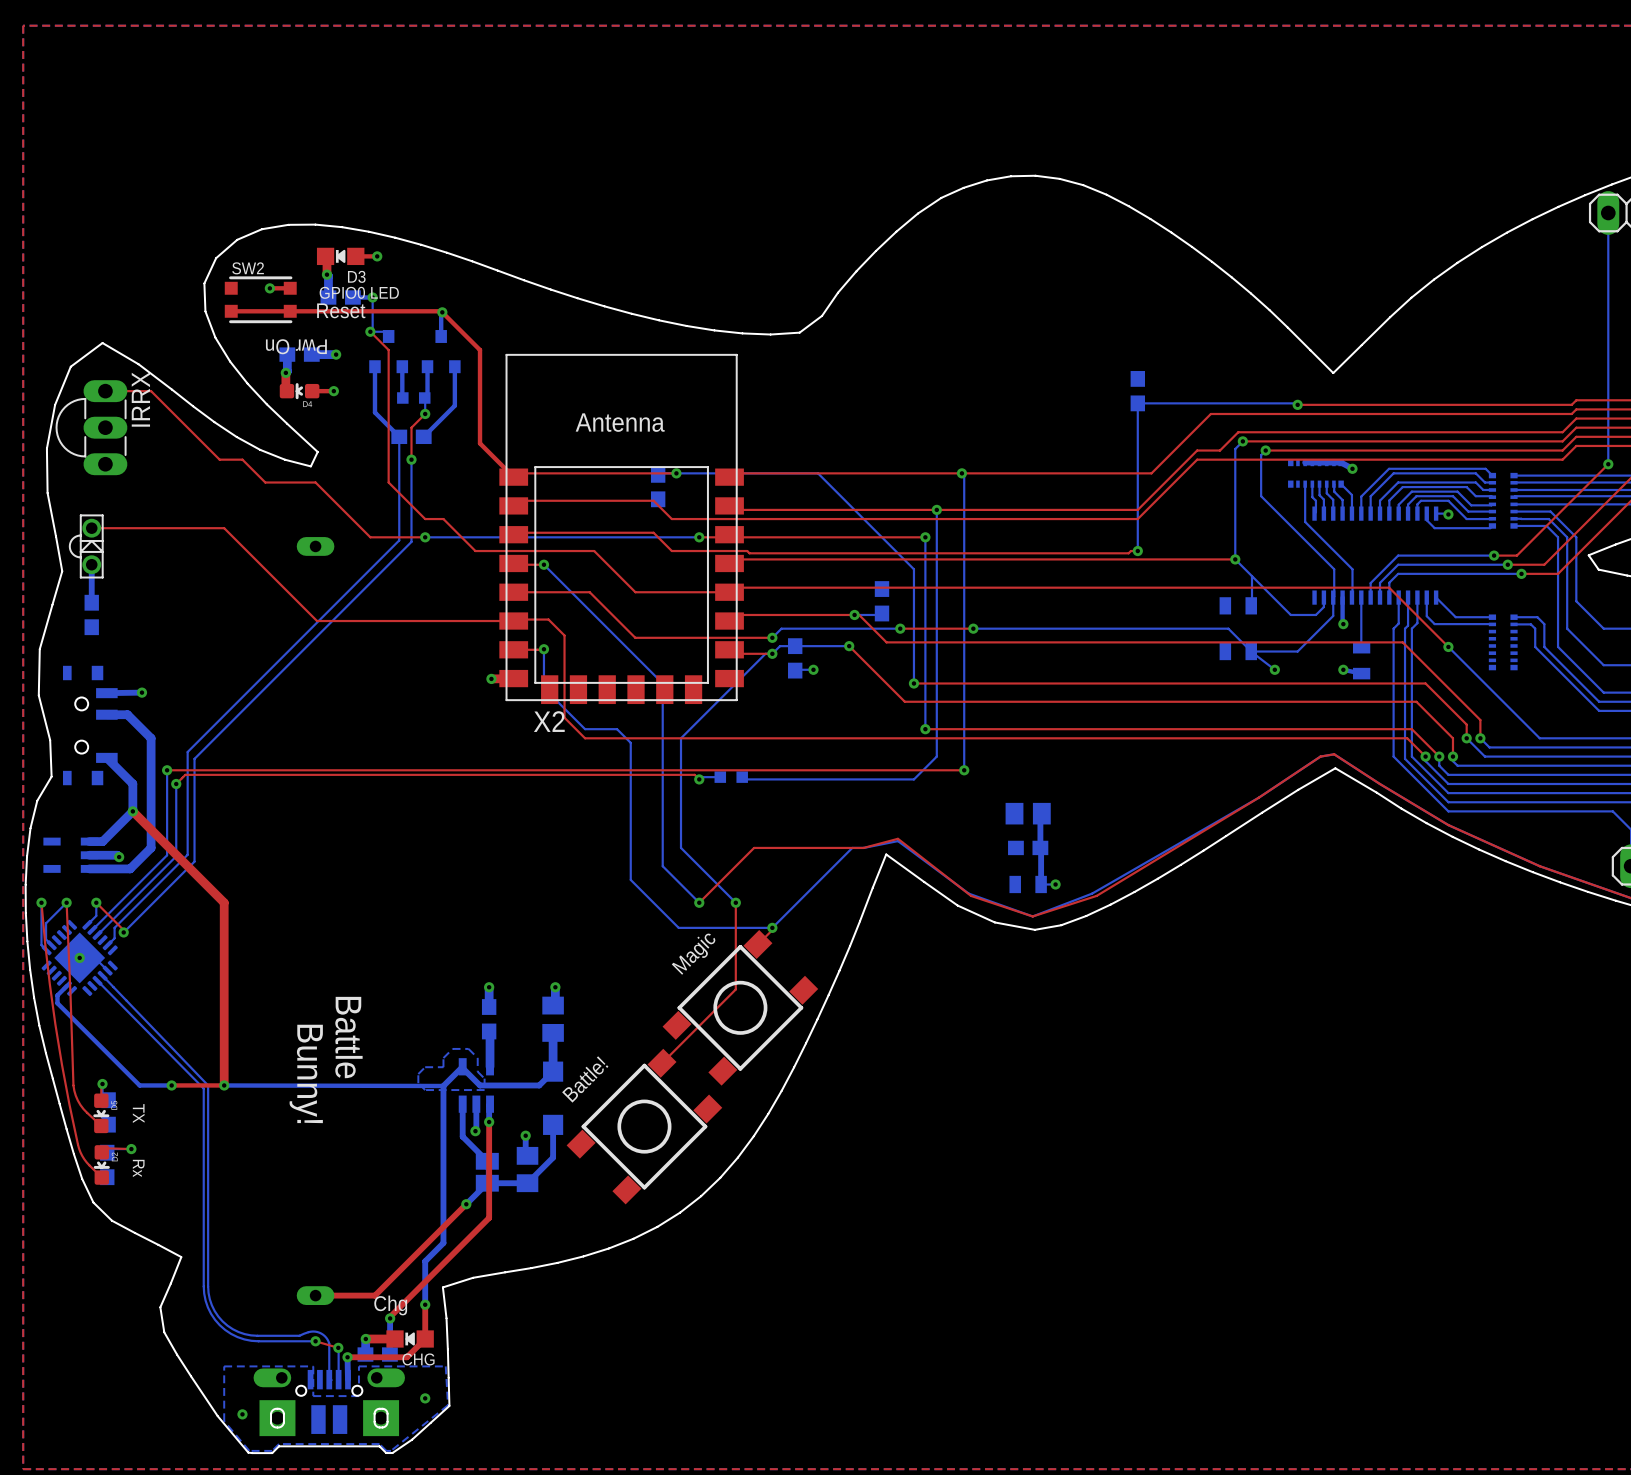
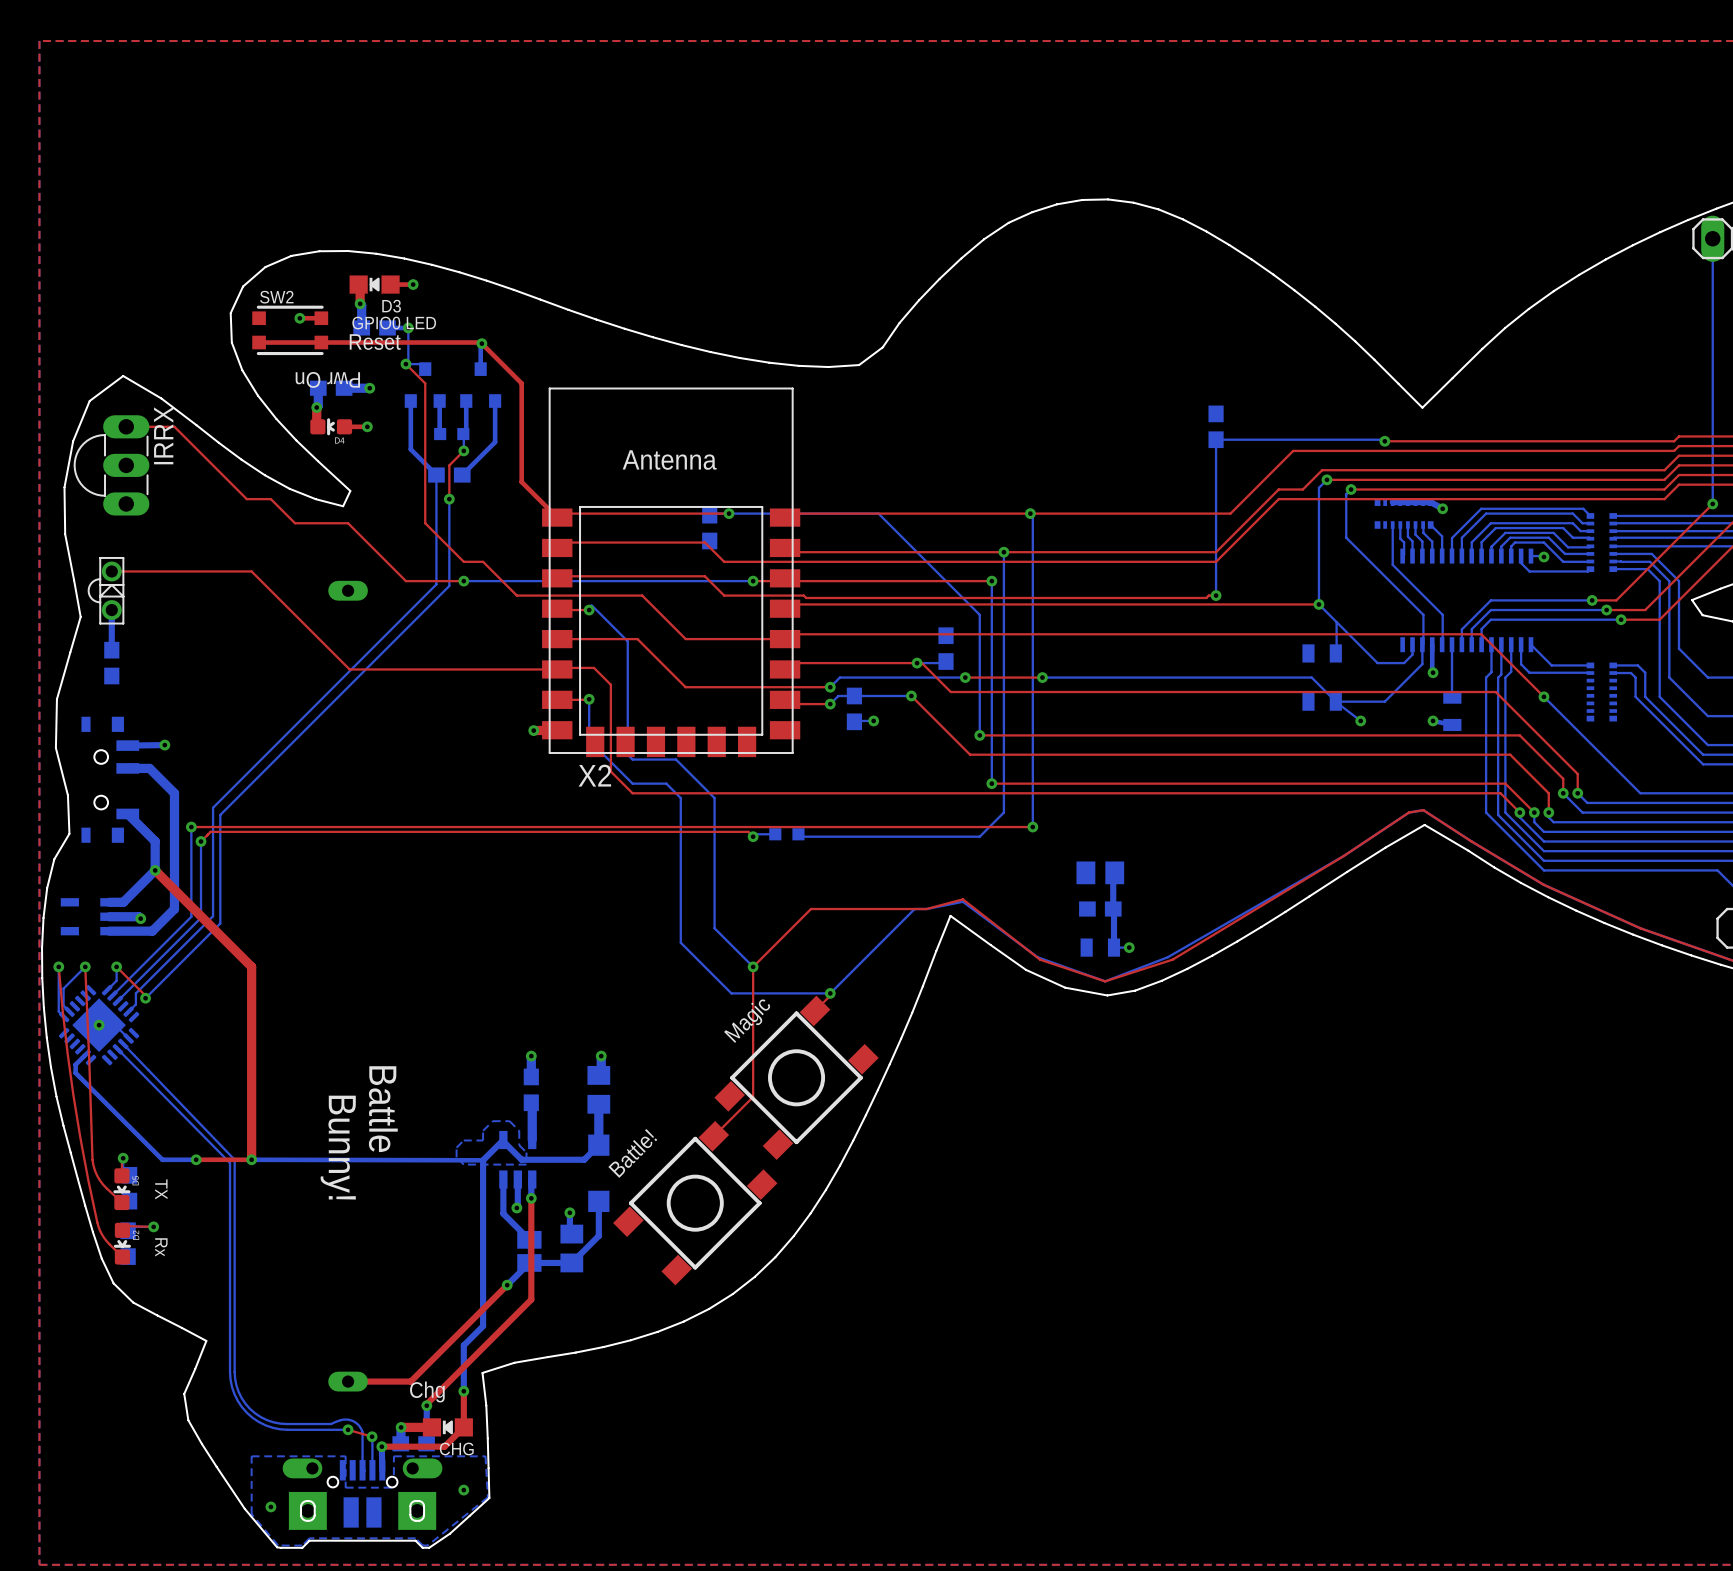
bottom track: (543, 564) (662, 683) (662, 742) -> (591, 605) (627, 641) (627, 754) (632, 759) (675, 759) (714, 798)
bottom track: (772, 653) (765, 653) (681, 738) (681, 847) (735, 902) -> none
top track: (735, 902) (735, 989) (699, 1025) -> (753, 966) (753, 1096)
via: (735, 902) -> none

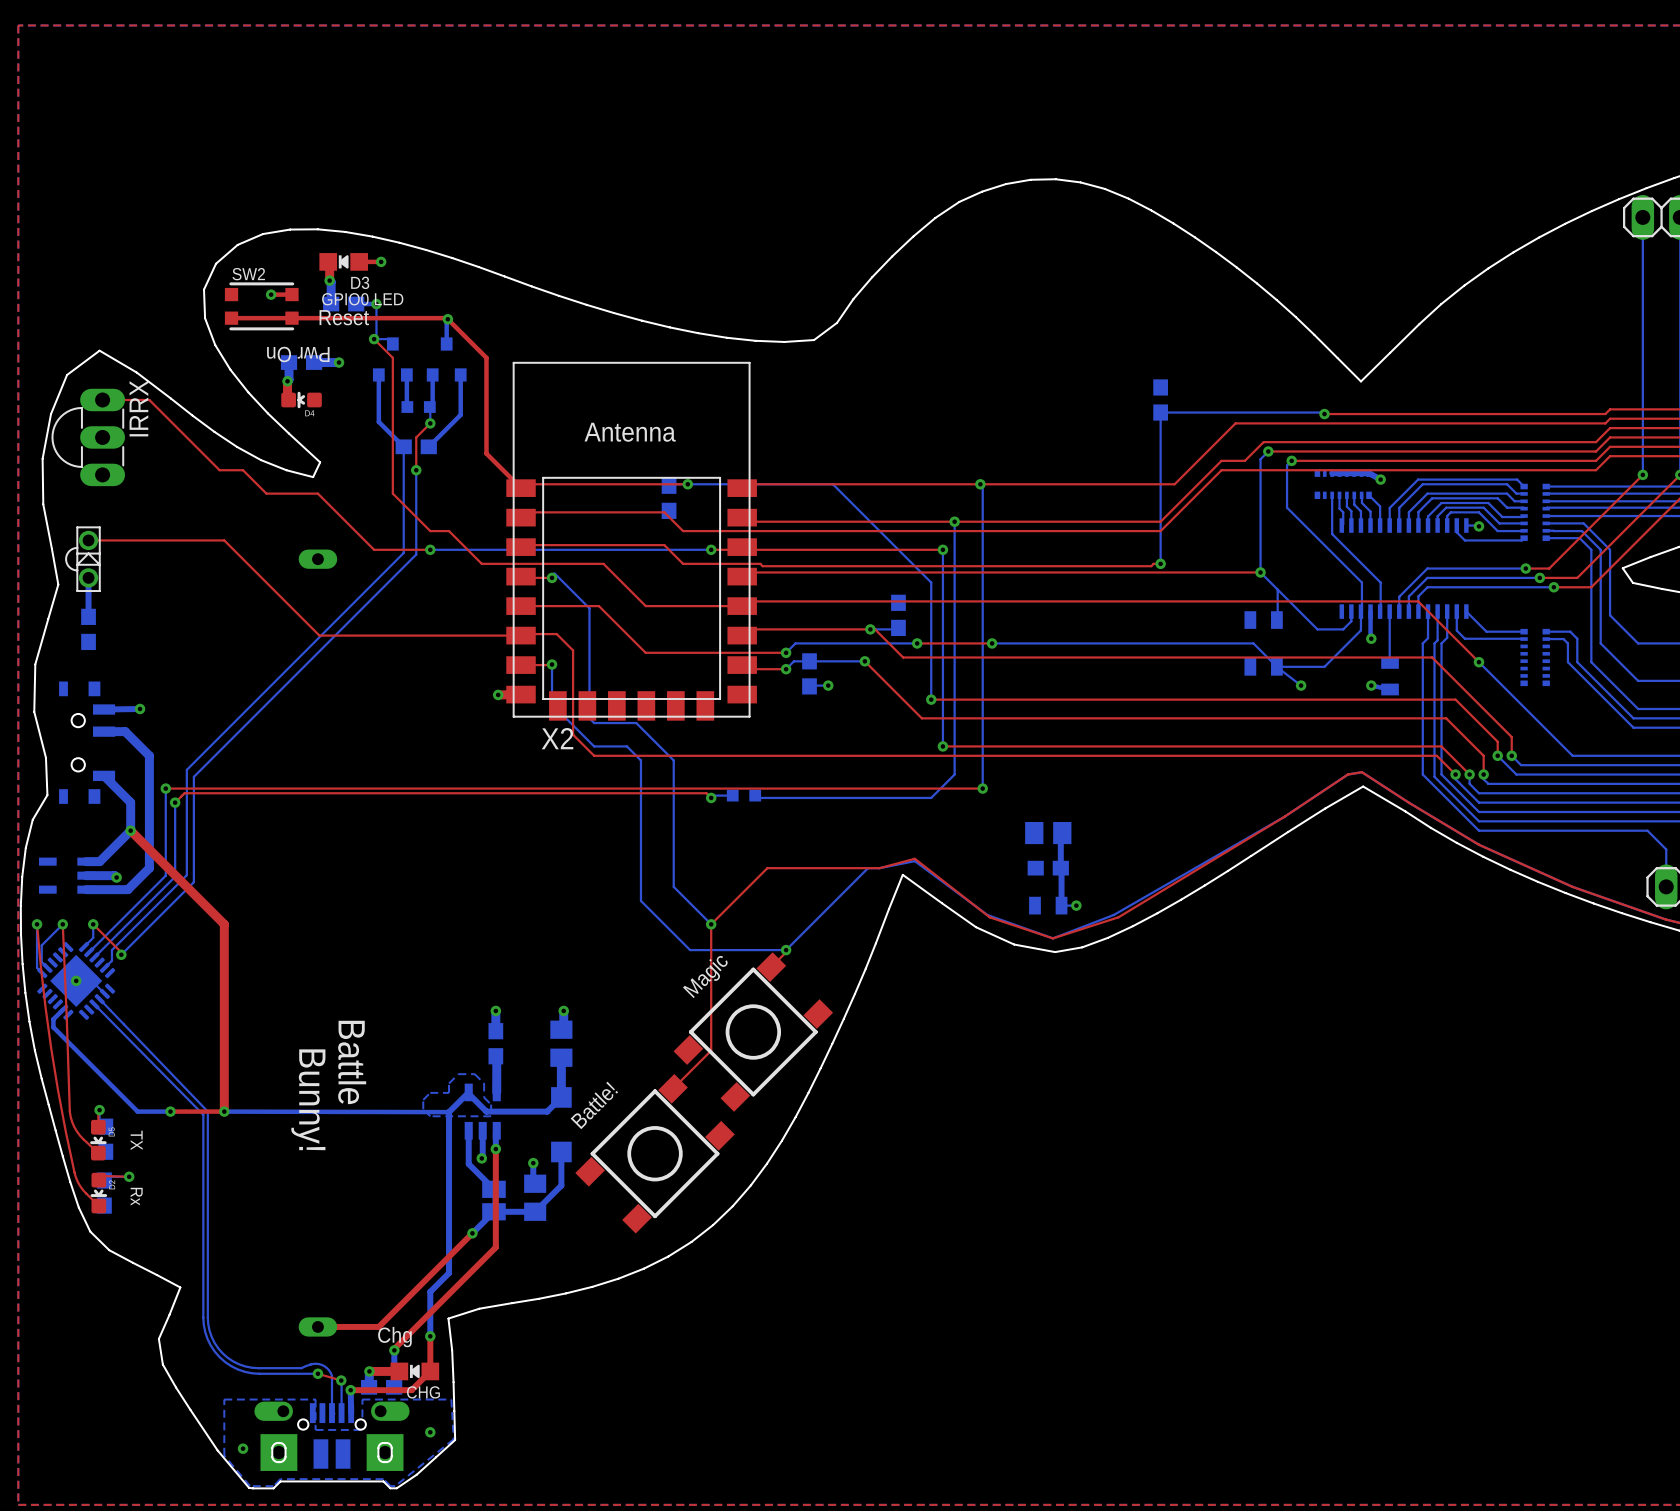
top track: (344, 426) (367, 426) -> none
via: (367, 426) -> none

